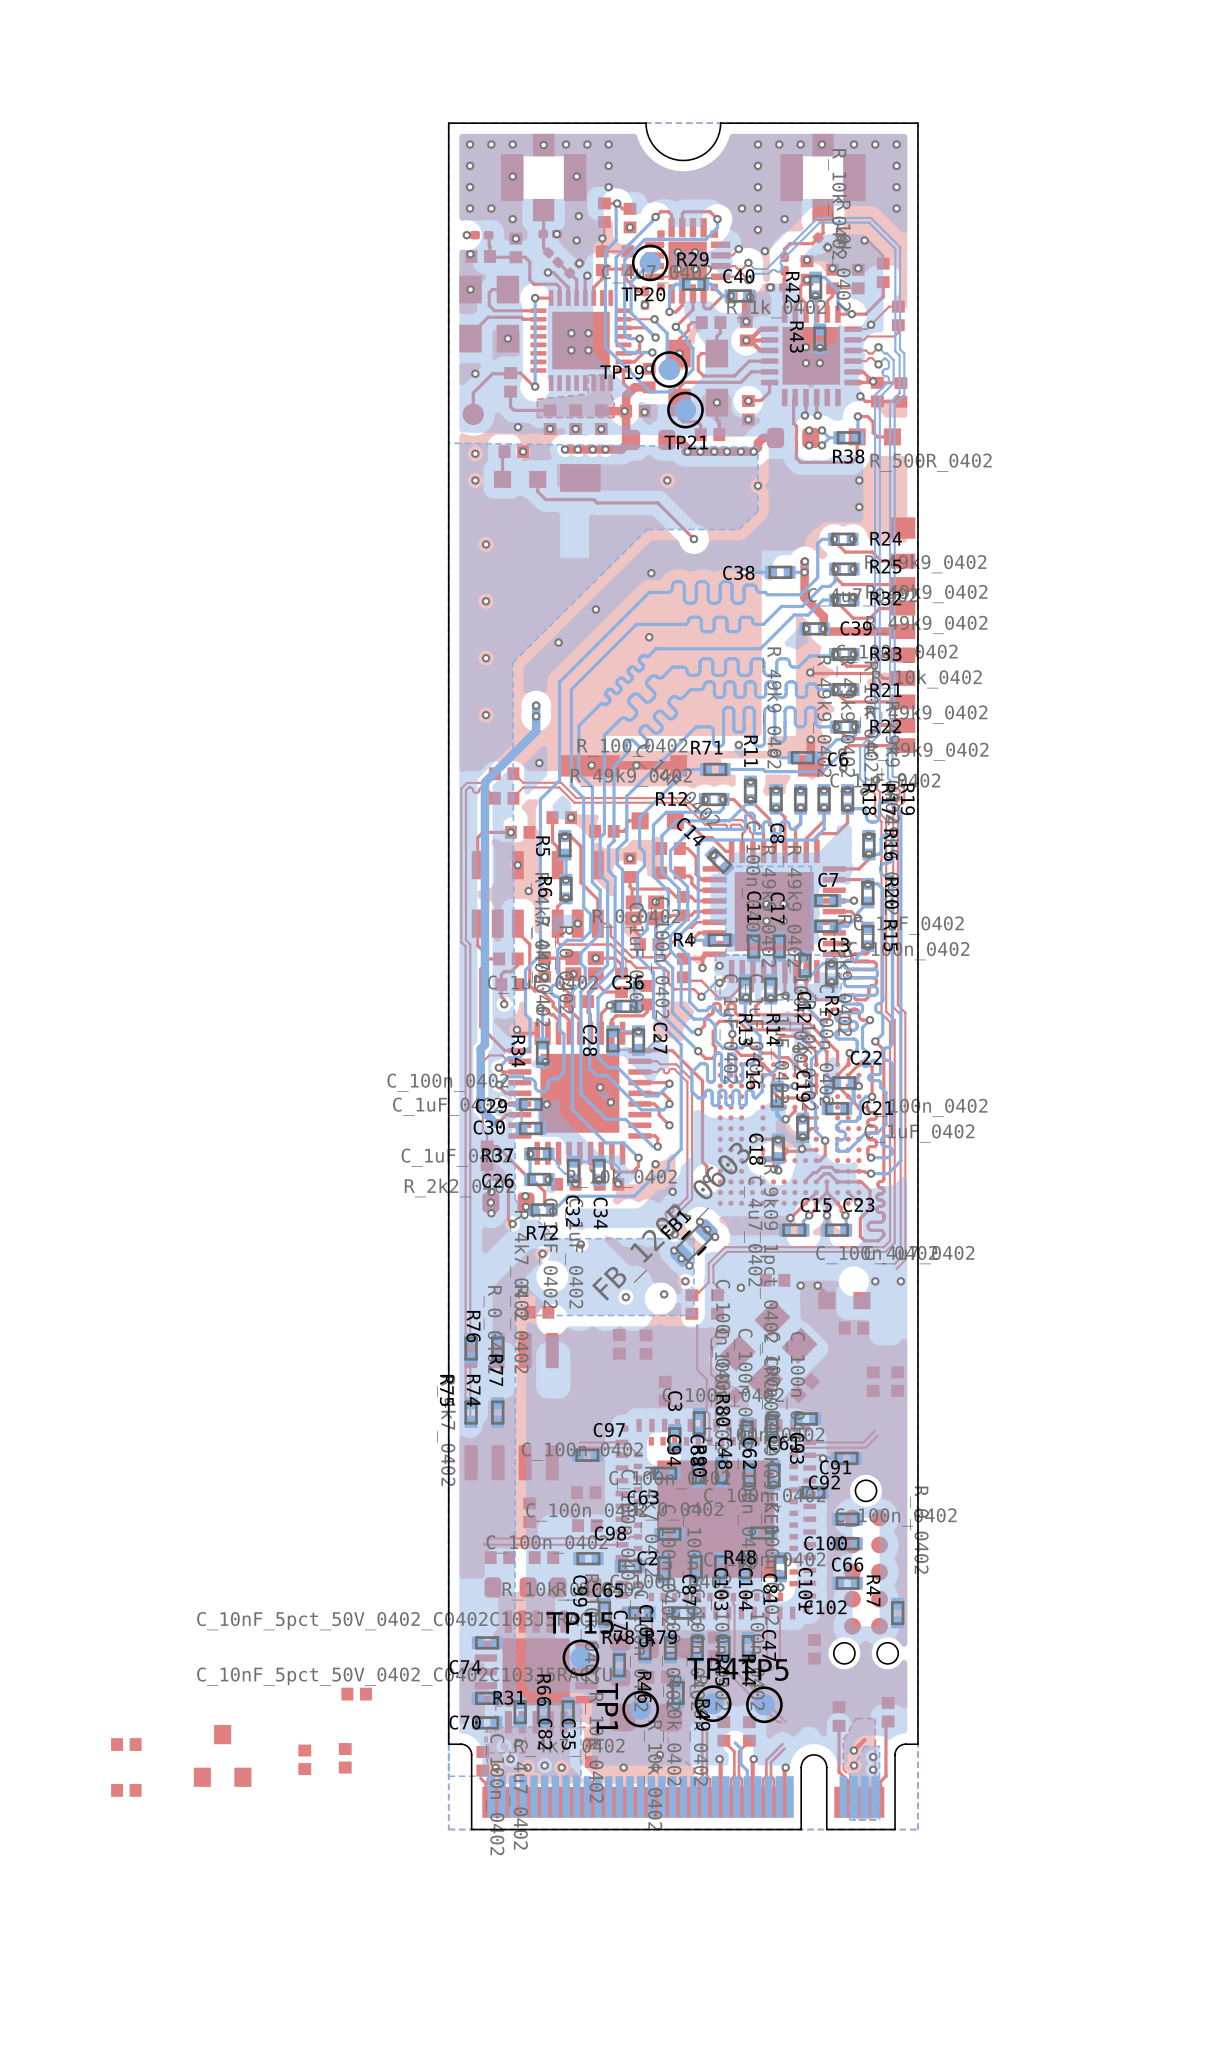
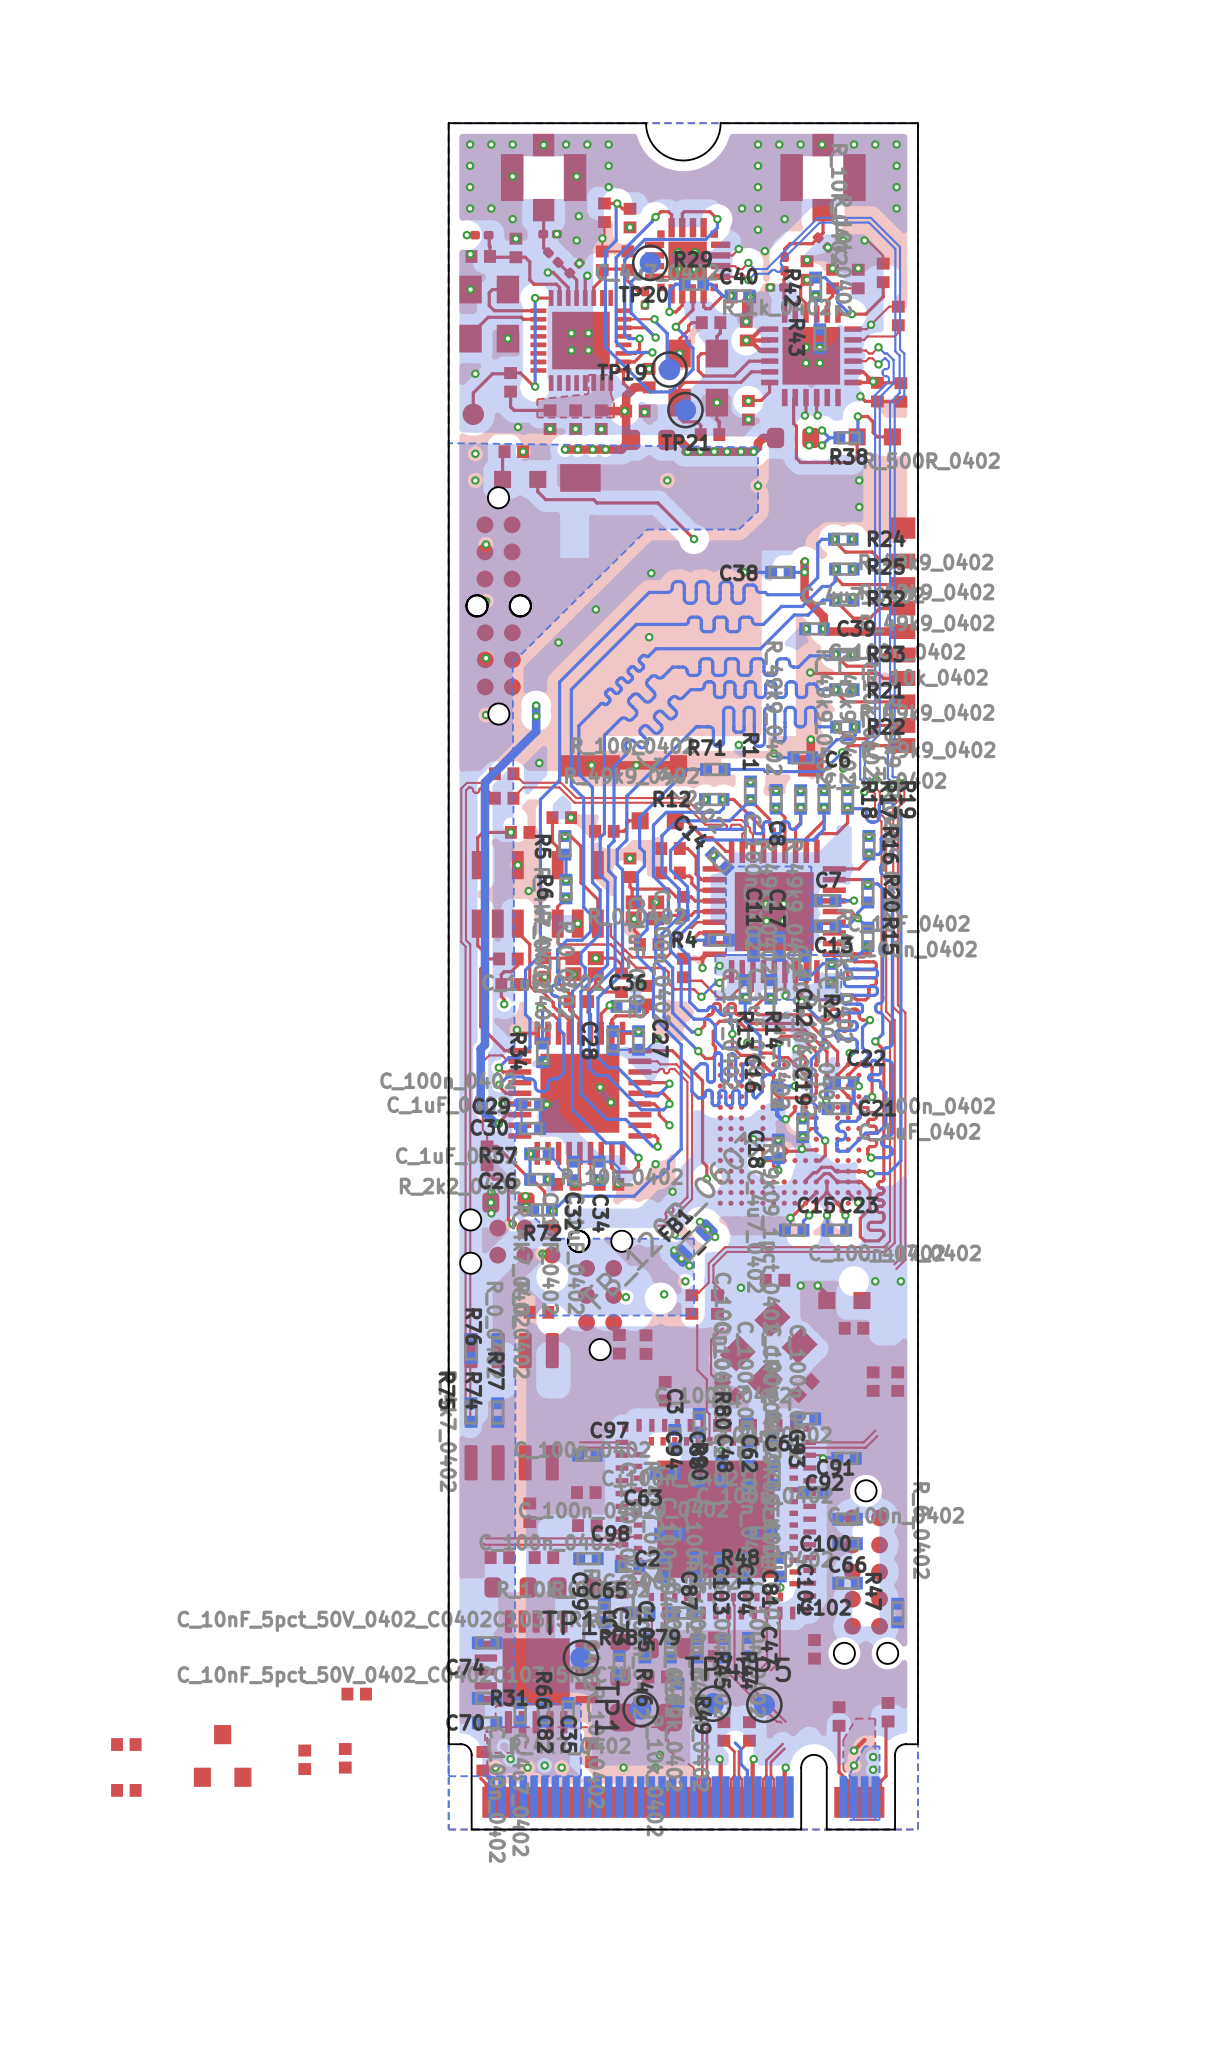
part: none -> (498, 551)
part: none -> (498, 659)
part: none -> (524, 1241)
part: none -> (600, 1295)

